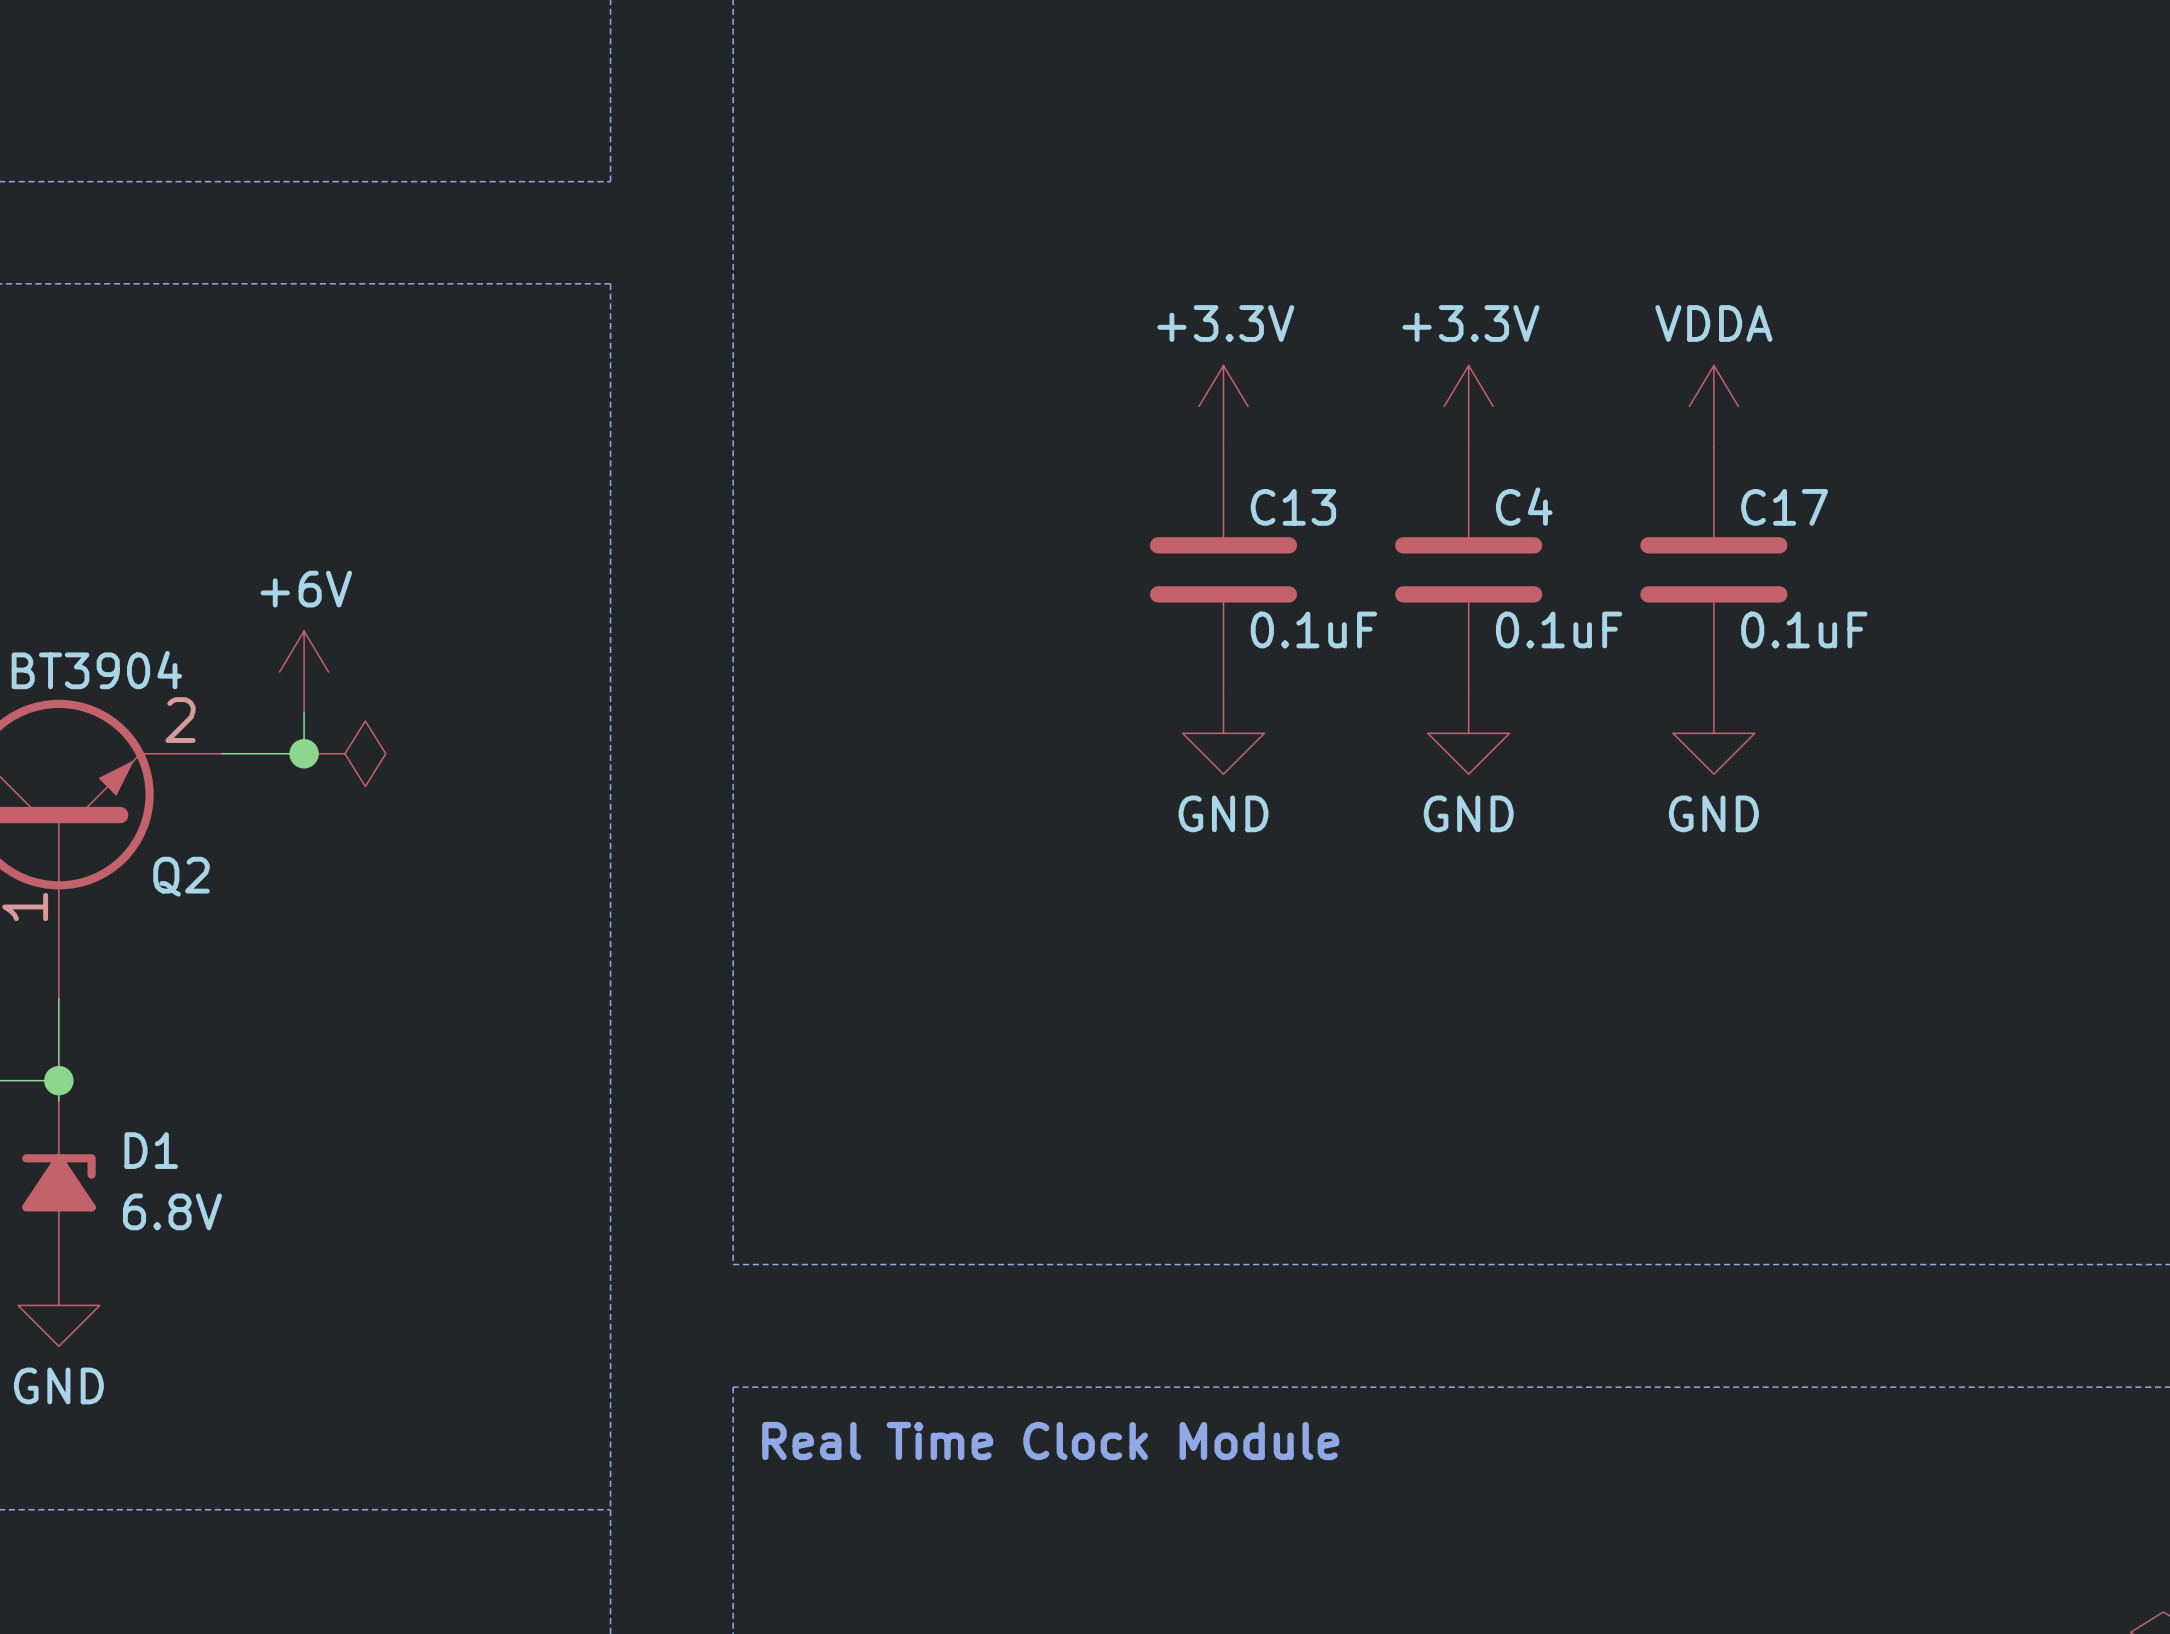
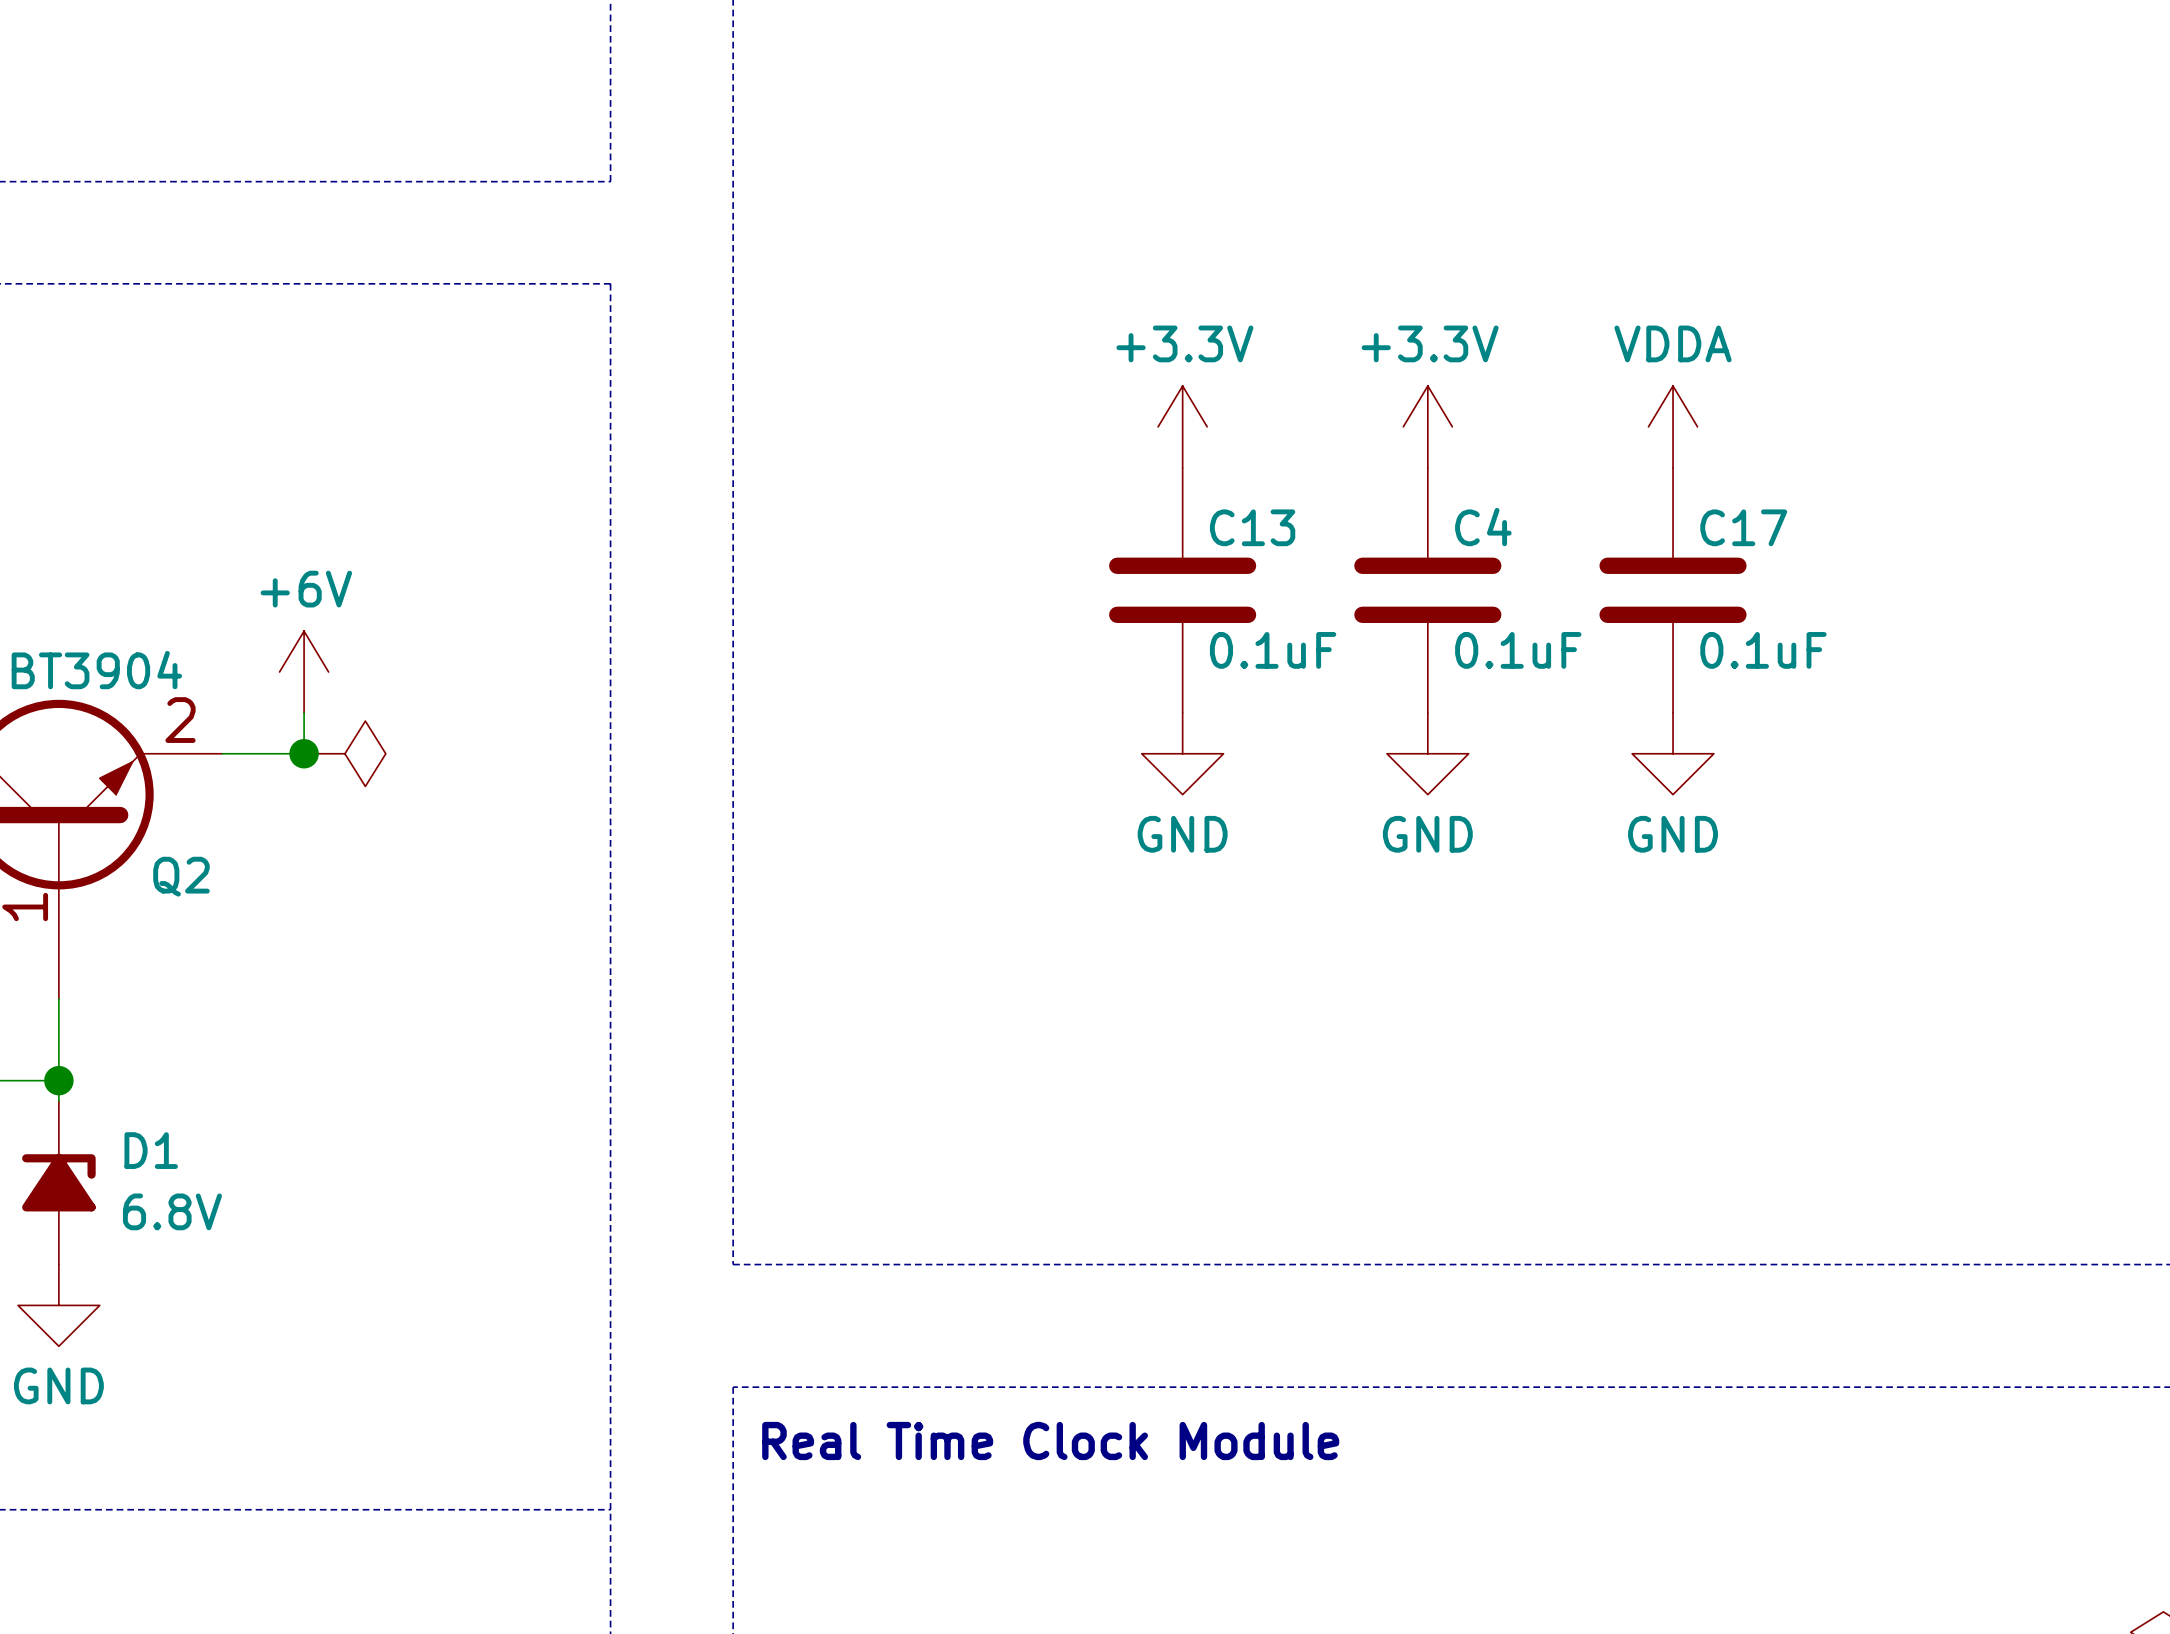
power symbol position: +3.3V (1223, 406) -> +3.3V (1182, 426)
power symbol position: +3.3V (1468, 406) -> +3.3V (1427, 426)
power symbol position: VDDA (1713, 406) -> VDDA (1673, 426)
C13 position: (1223, 569) -> (1182, 590)
C4 position: (1468, 569) -> (1427, 590)
C17 position: (1713, 569) -> (1673, 590)
power symbol position: GND (1223, 733) -> GND (1182, 753)
power symbol position: GND (1468, 733) -> GND (1427, 753)
power symbol position: GND (1713, 733) -> GND (1673, 753)

